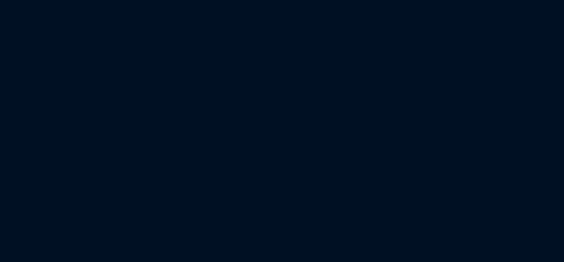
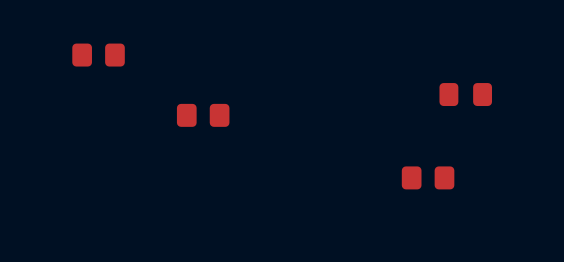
part: none -> (98, 55)
part: none -> (465, 94)
part: none -> (203, 115)
part: none -> (428, 177)

